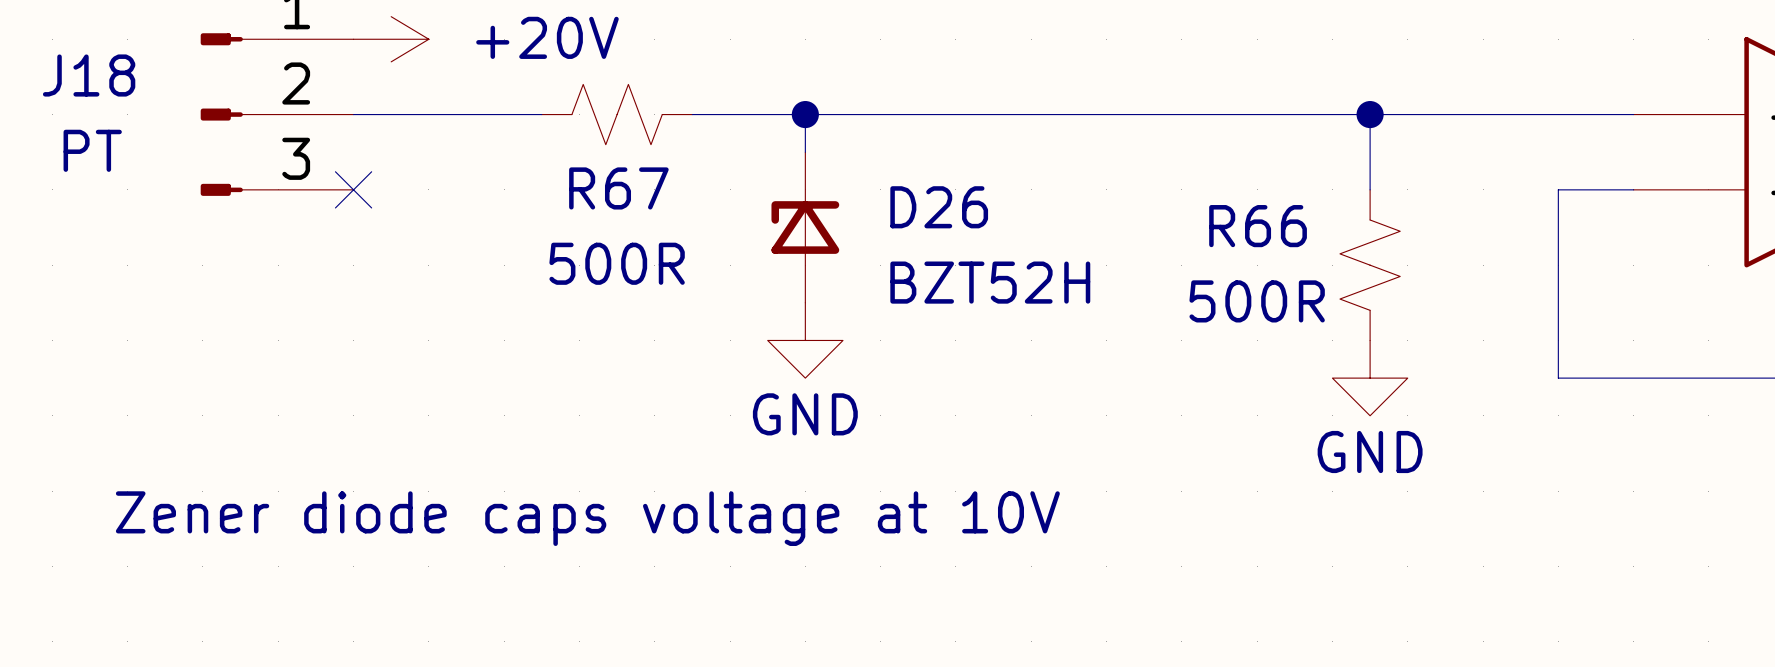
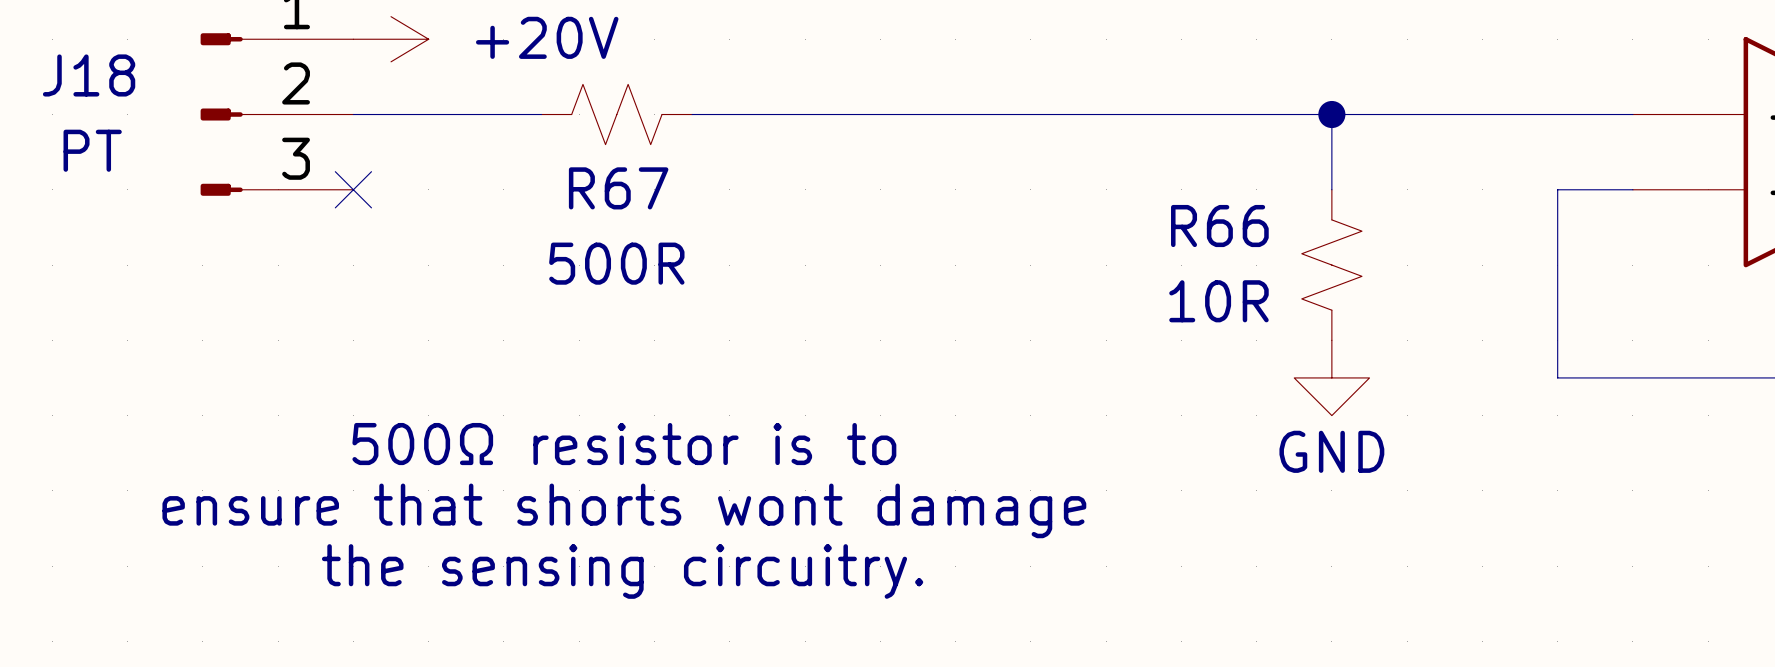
wire: (805, 114) (805, 152) -> none
junction: (805, 114) -> none
wire: (1370, 114) (1370, 189) -> (1331, 114) (1331, 189)
junction position: (1370, 114) -> (1331, 114)
D26: BZT52H (805, 227) -> none
R66 position: (1370, 265) -> (1331, 265)
R66 value: 500R (1257, 301) -> 10R (1218, 301)
power symbol: GND (805, 340) -> none
power symbol position: GND (1370, 378) -> GND (1331, 377)
text: none -> 500Ω resistor is to (624, 444)
text: none -> ensure that shorts wont damage (624, 510)
text: Zener diode caps voltage at 10V (587, 518) -> none
text: none -> the sensing circuitry. (622, 571)

